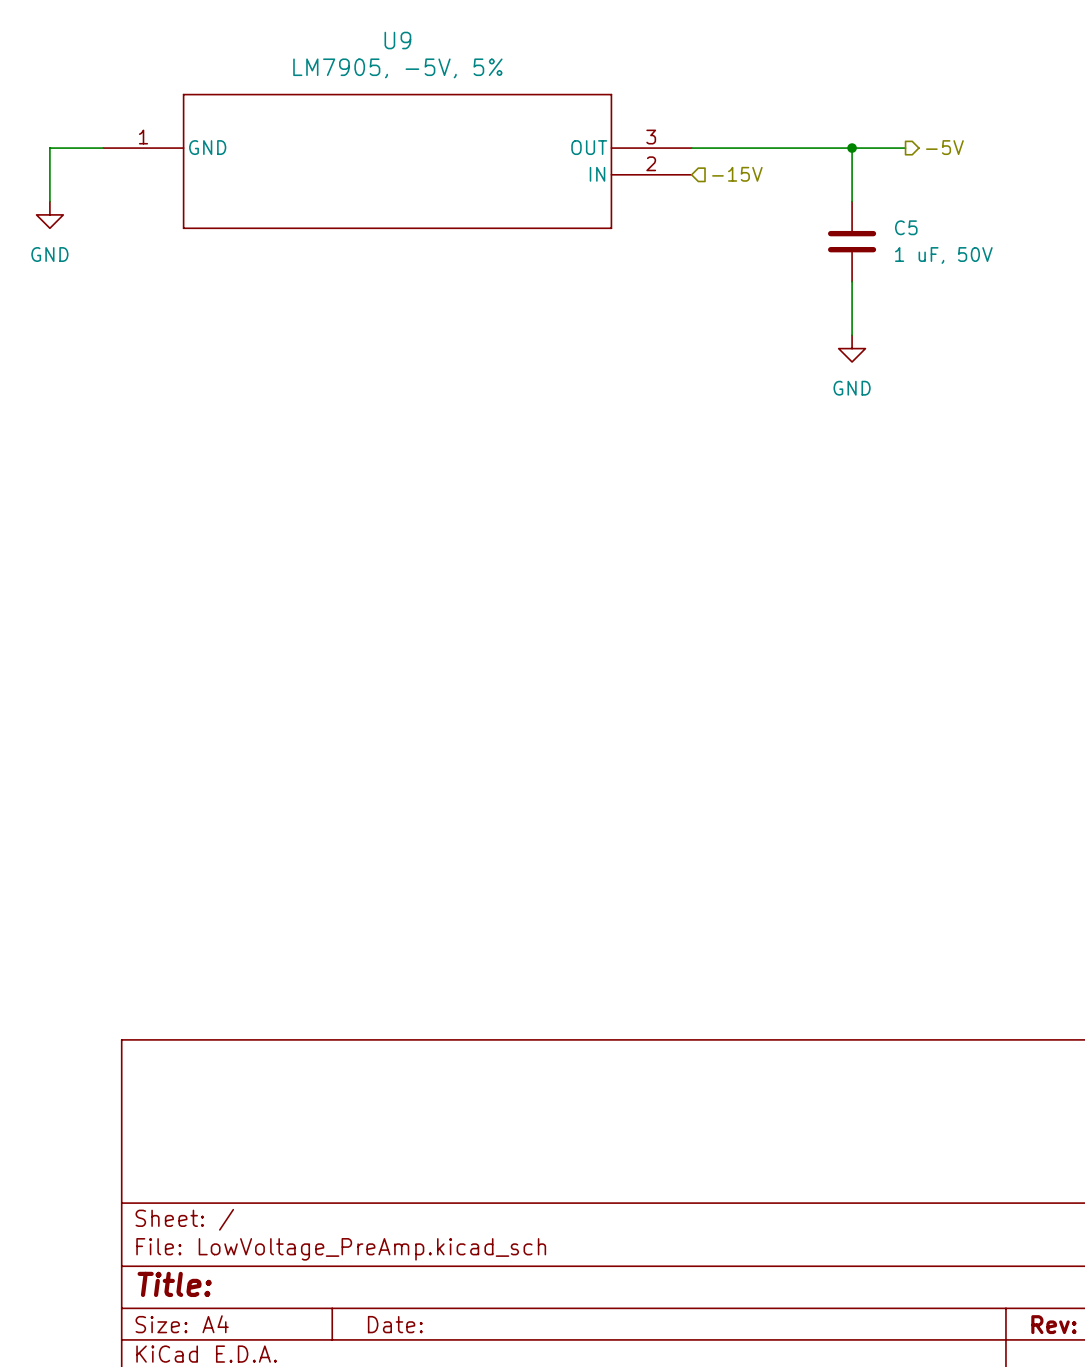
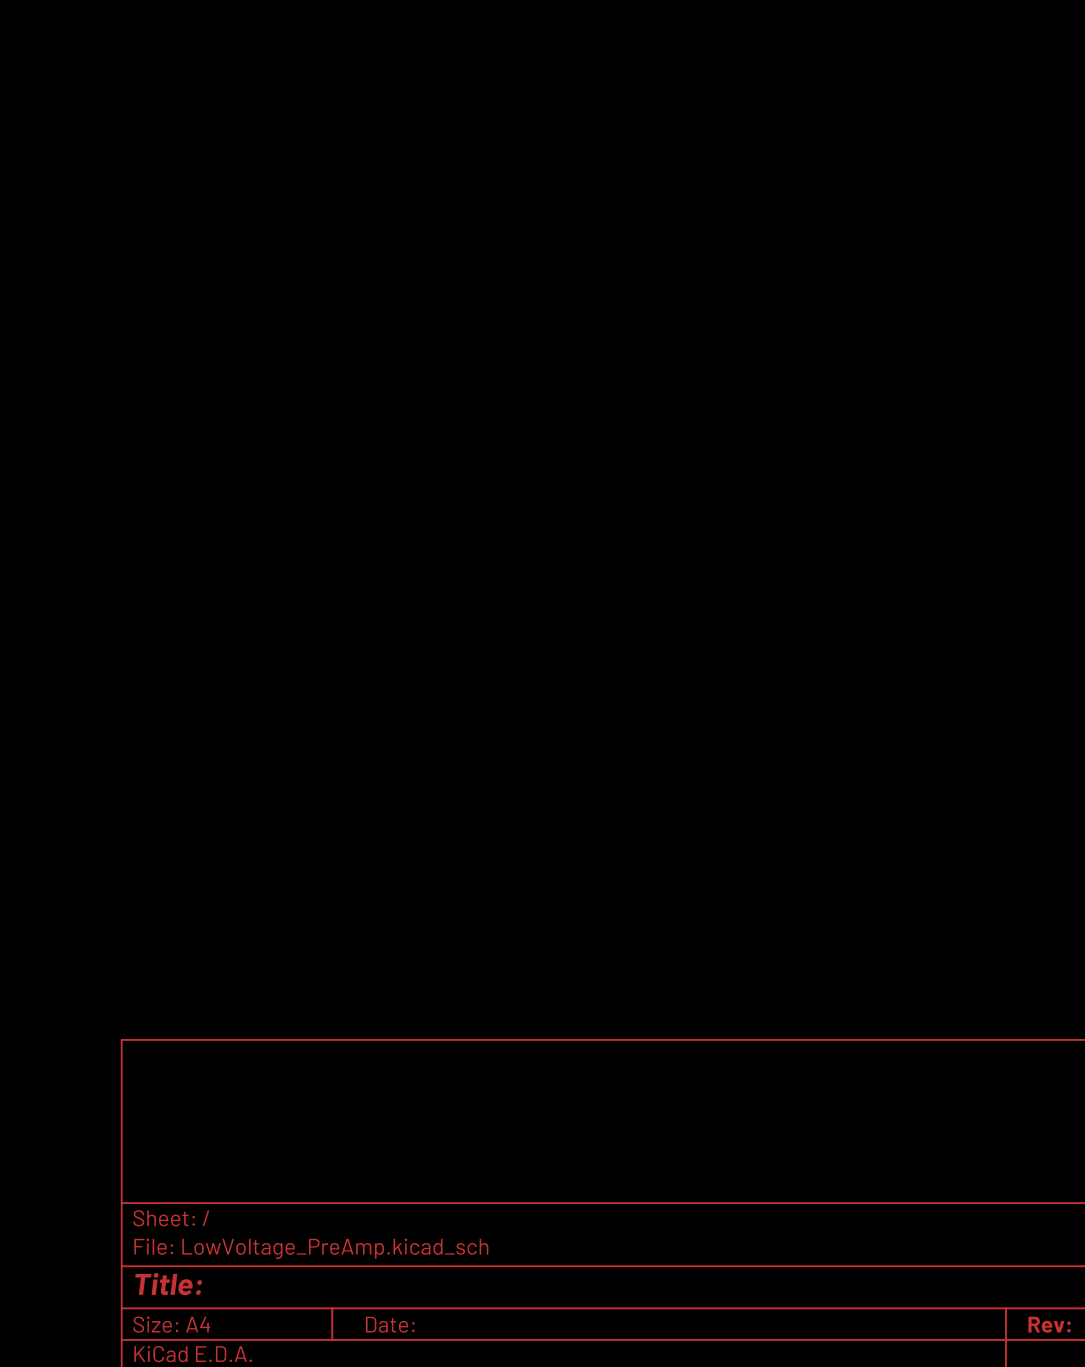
hierarchical label: -5V (944, 147) -> none
wire: (103, 148) (49, 148) (49, 201) -> none
wire: (691, 148) (905, 148) -> none
wire: (852, 148) (852, 201) -> none
junction: (852, 148) -> none
U9: LM7905, -5V, 5% (397, 161) -> none
hierarchical label: -15V (737, 174) -> none
power symbol: GND (49, 214) -> none
C5: 1 uF, 50V (852, 241) -> none
wire: (852, 281) (852, 335) -> none
power symbol: GND (852, 348) -> none

